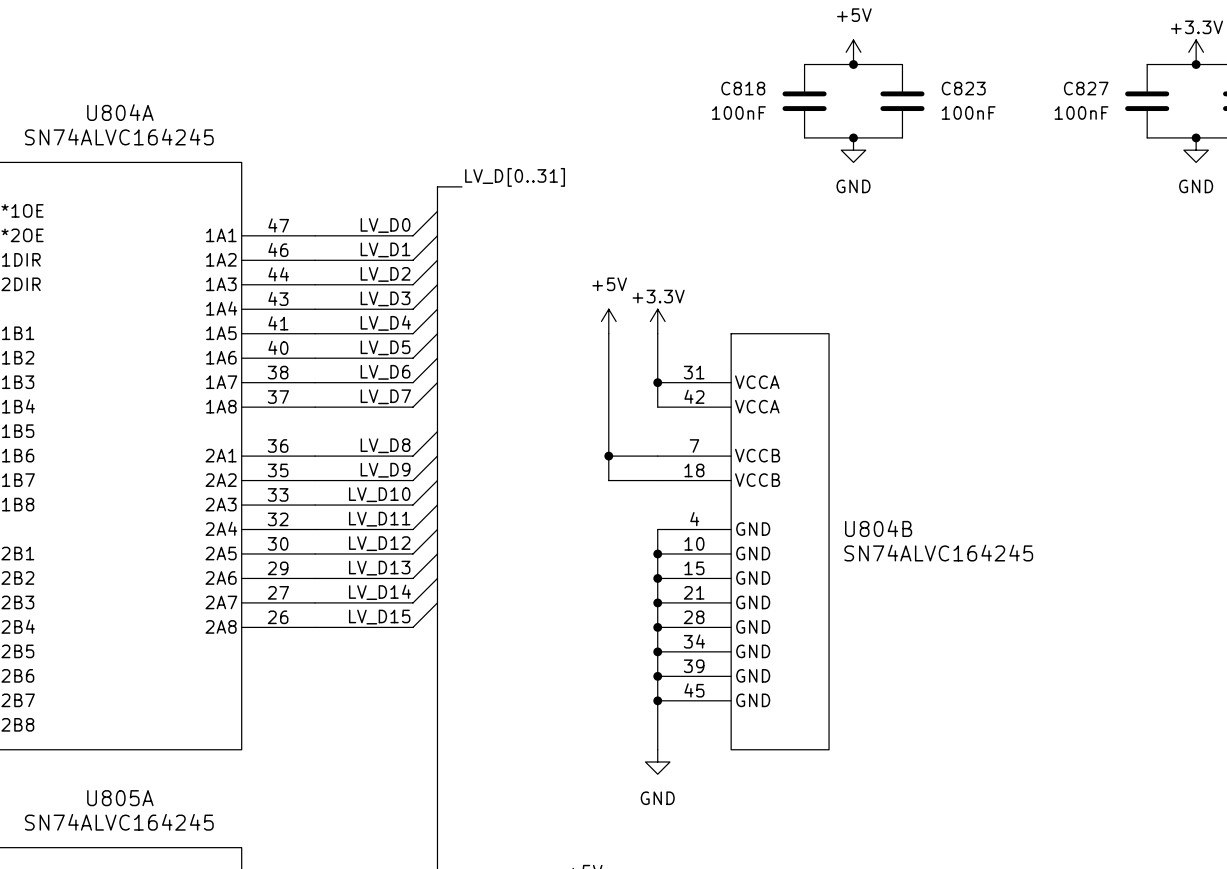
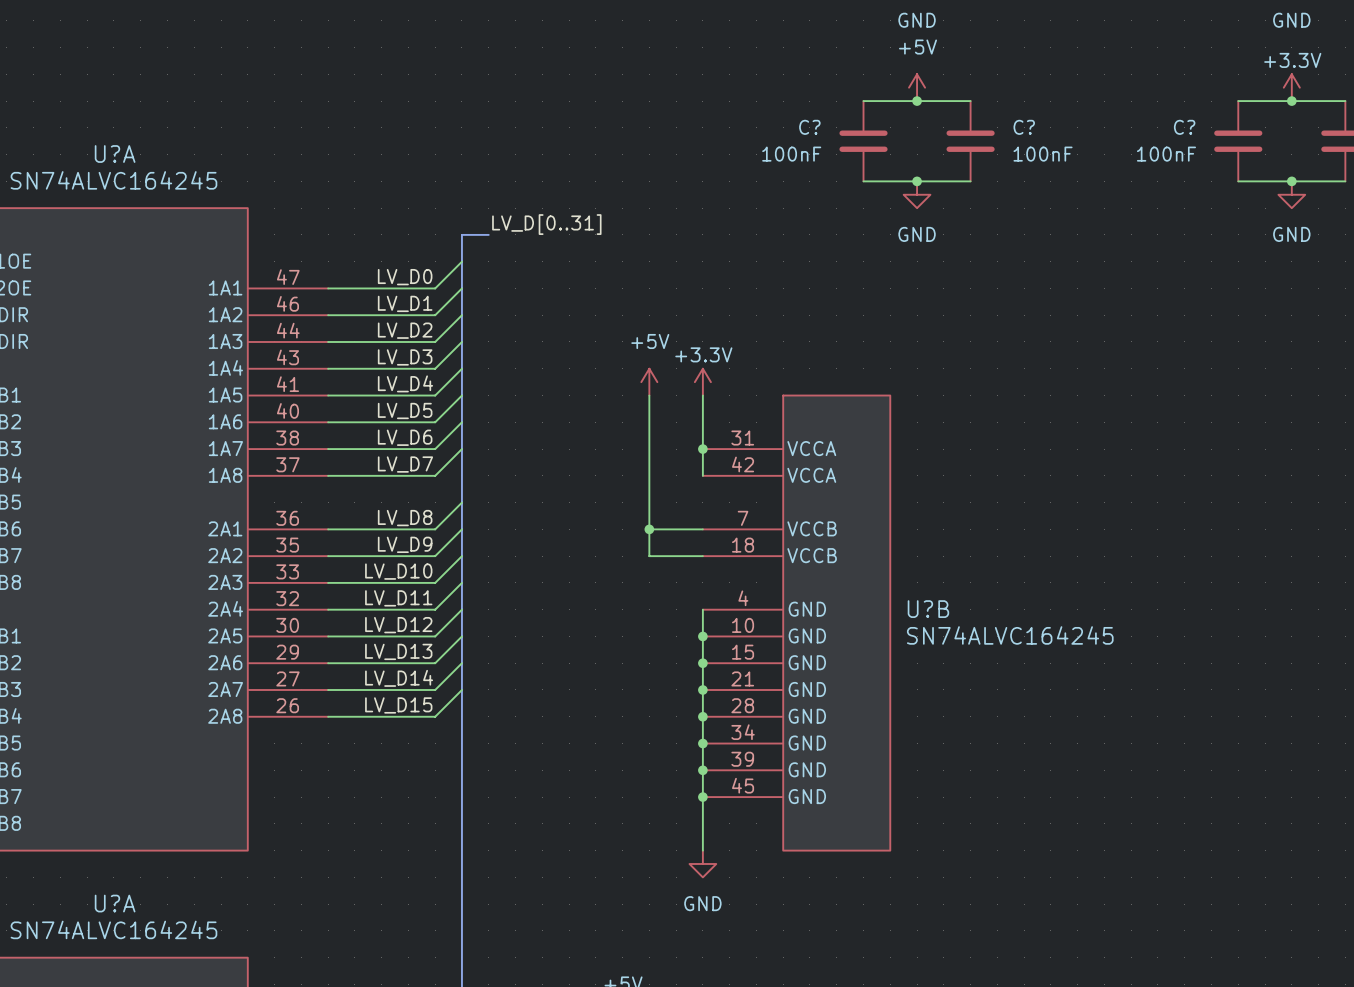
C818 name: C818 (743, 88) -> C? (809, 127)
C823 name: C823 (963, 88) -> C? (1024, 127)
C827 name: C827 (1086, 88) -> C? (1184, 127)
U804A name: U804A (120, 112) -> U?A (115, 154)
U804B name: U804B (878, 528) -> U?B (928, 609)
U805A name: U805A (120, 798) -> U?A (115, 903)

